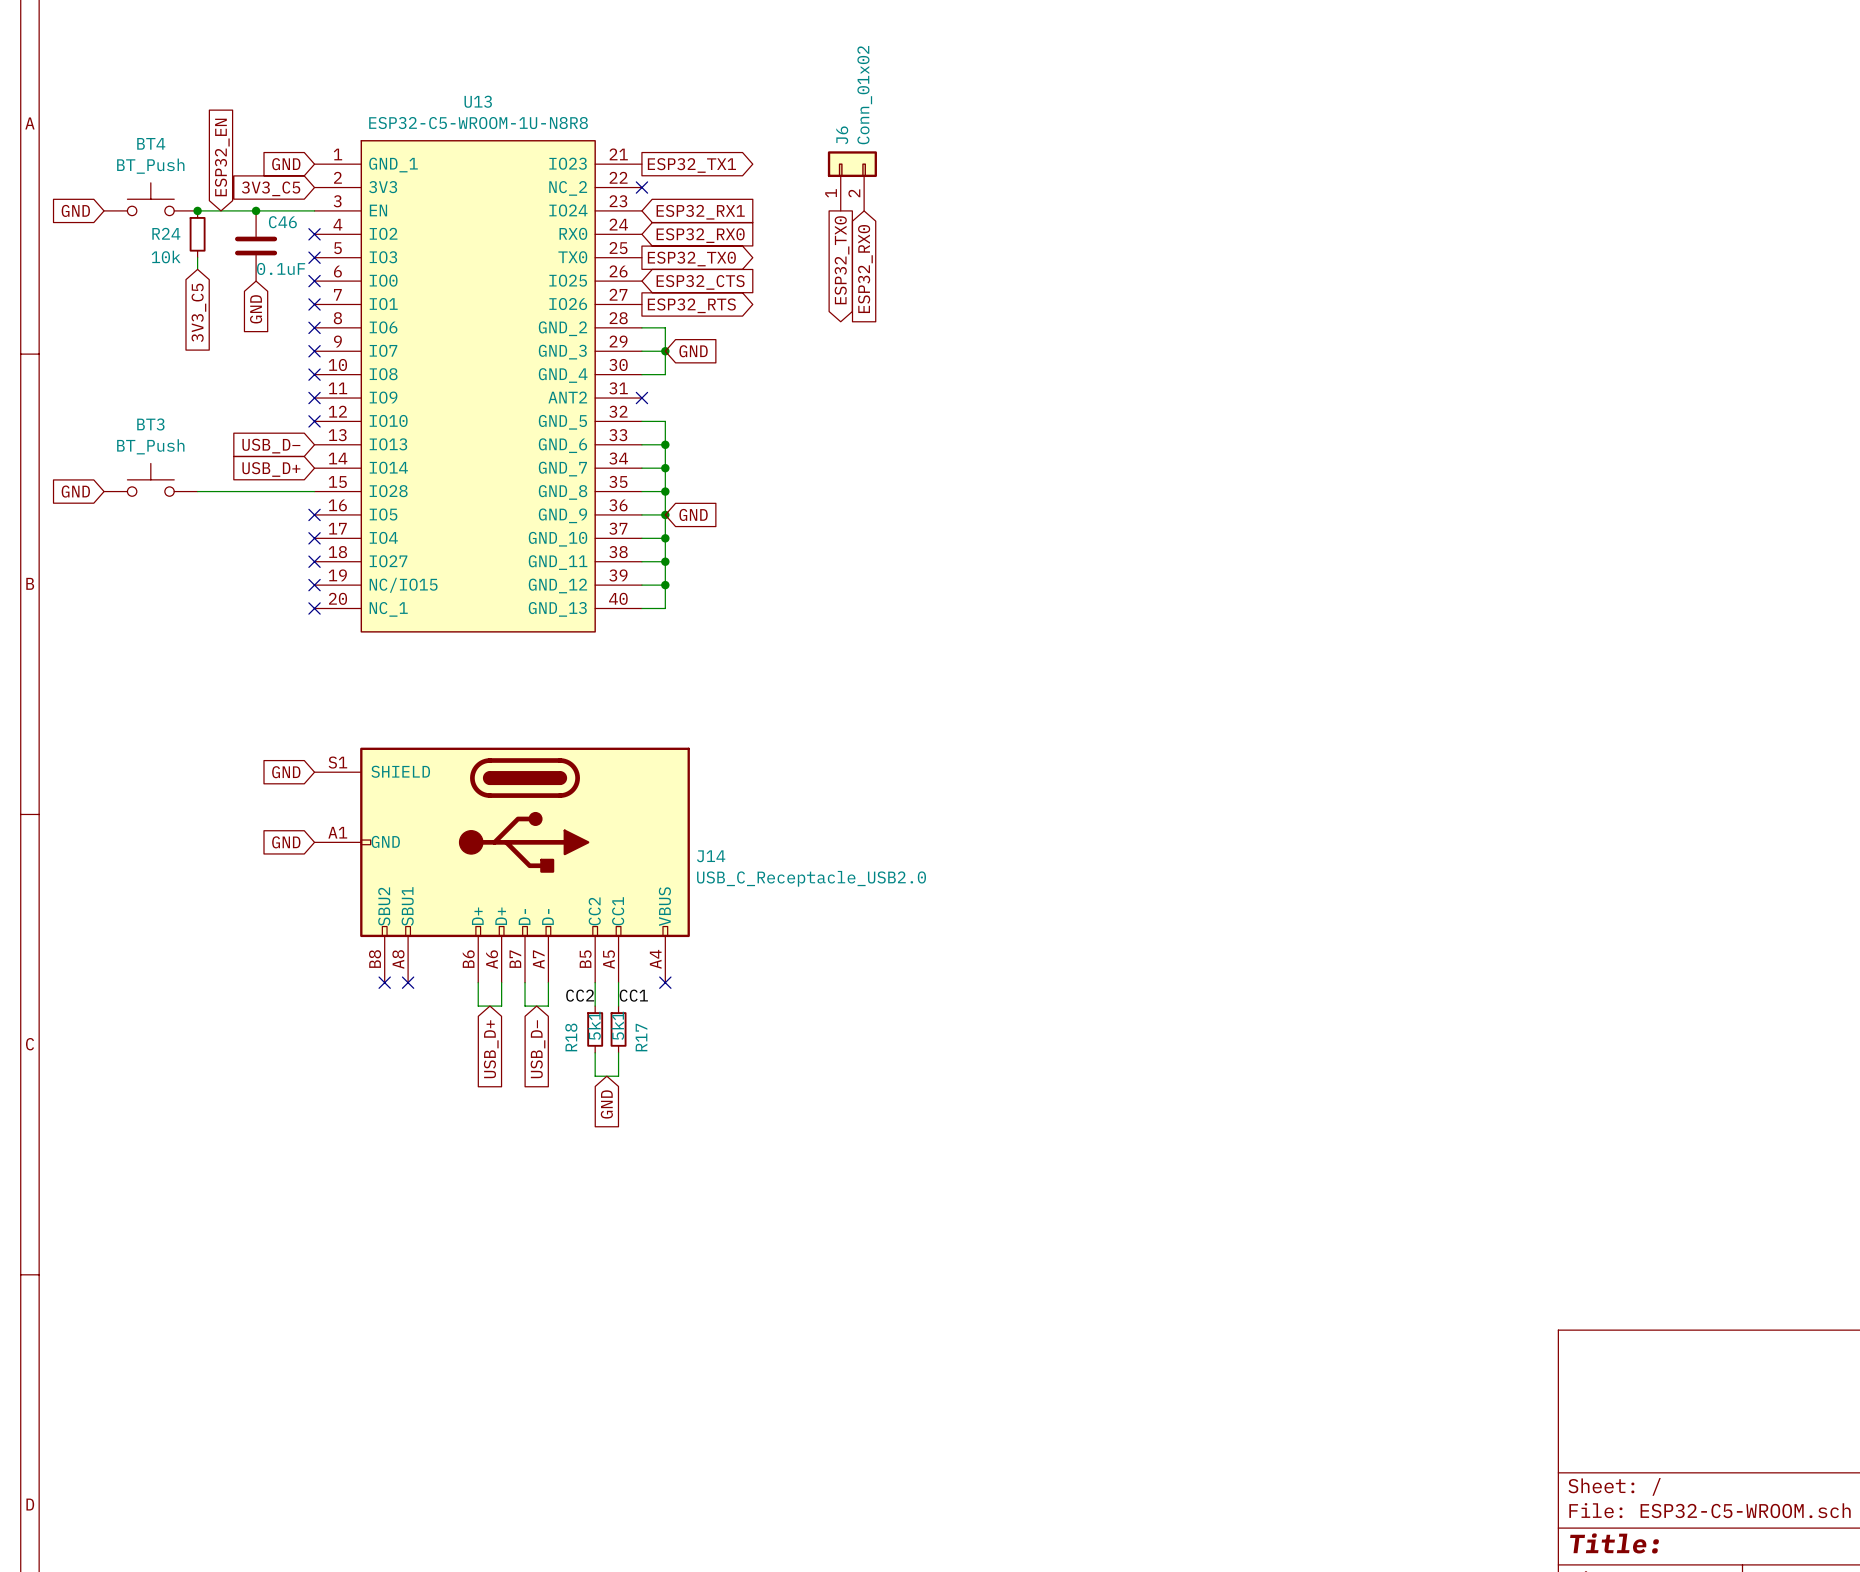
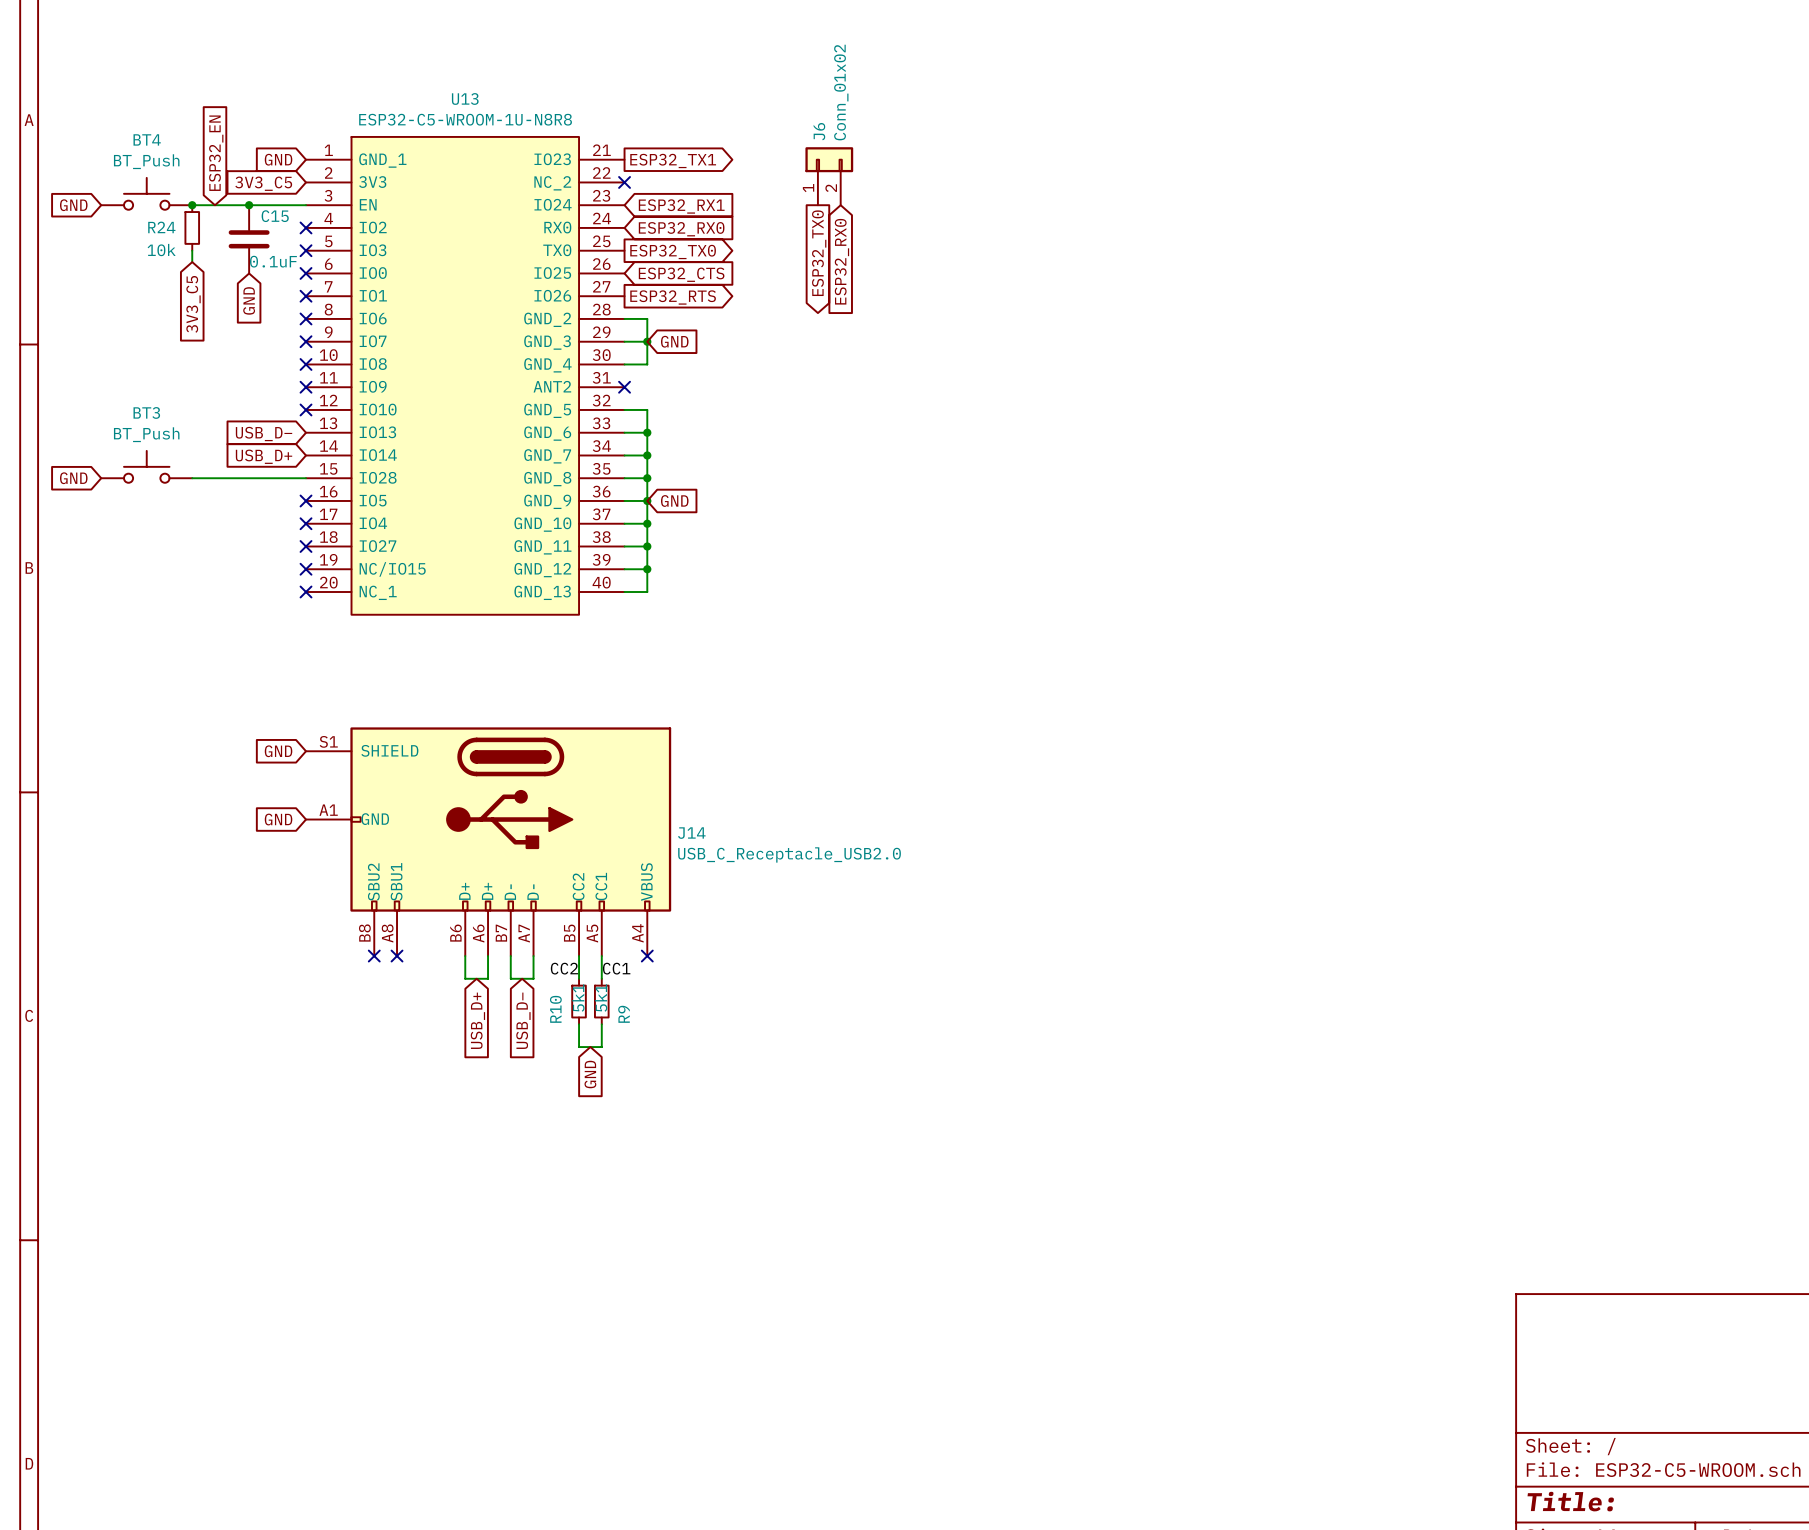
C46 name: C46 (282, 222) -> C15 (275, 216)
R18 name: R18 (571, 1037) -> R10 (555, 1009)
R17 name: R17 (641, 1037) -> R9 (624, 1014)

